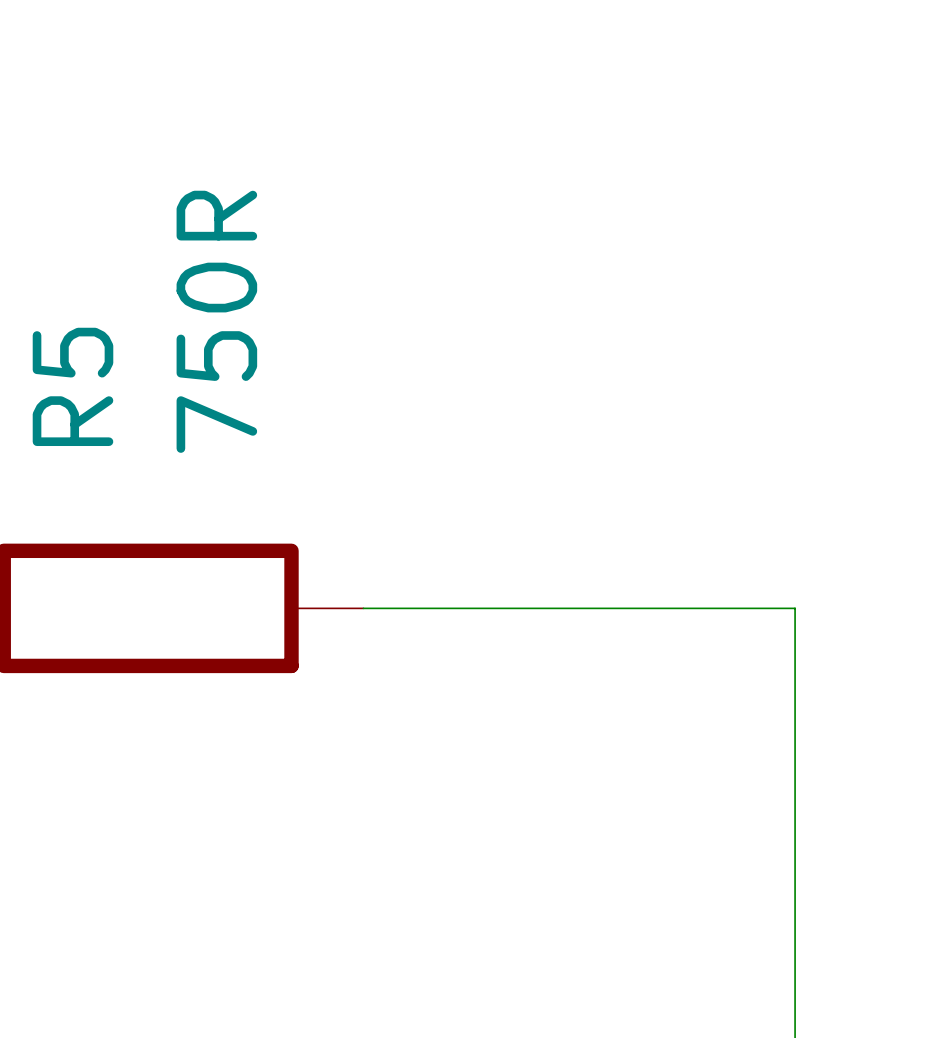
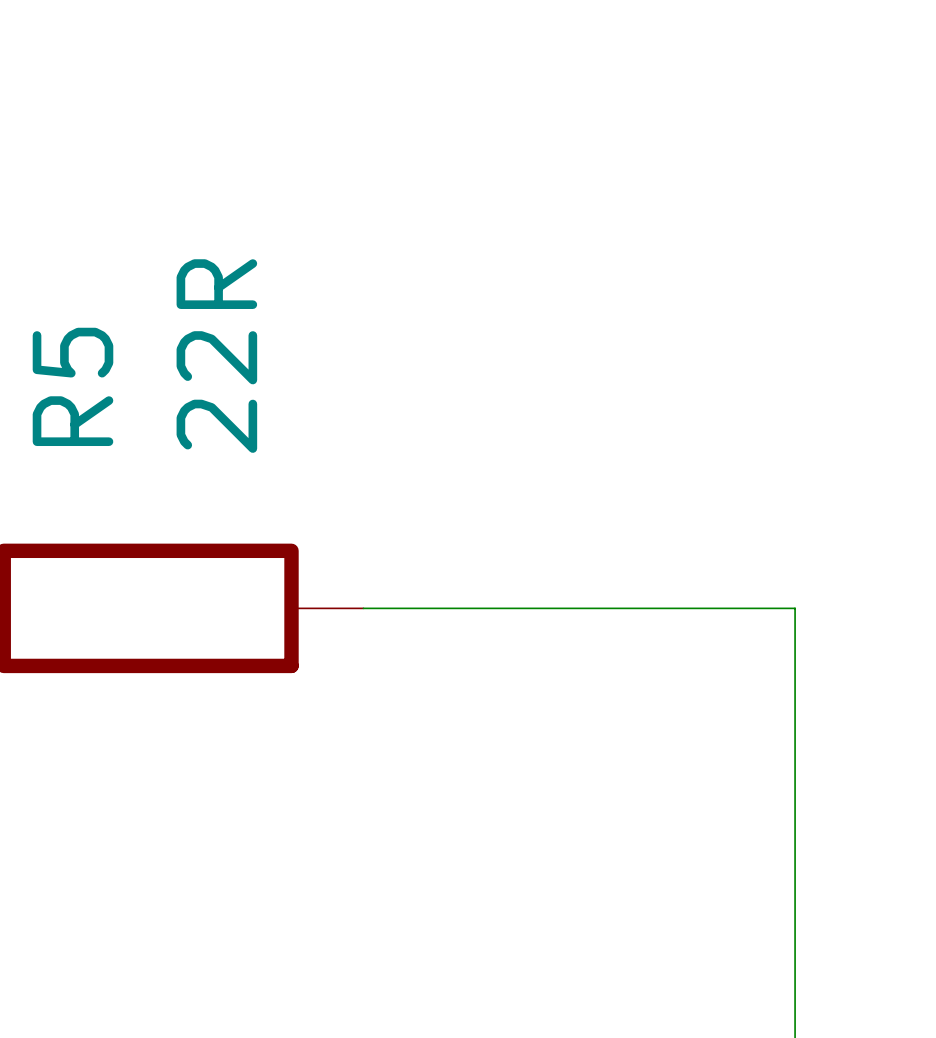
R5 value: 750R (216, 321) -> 22R (216, 356)

